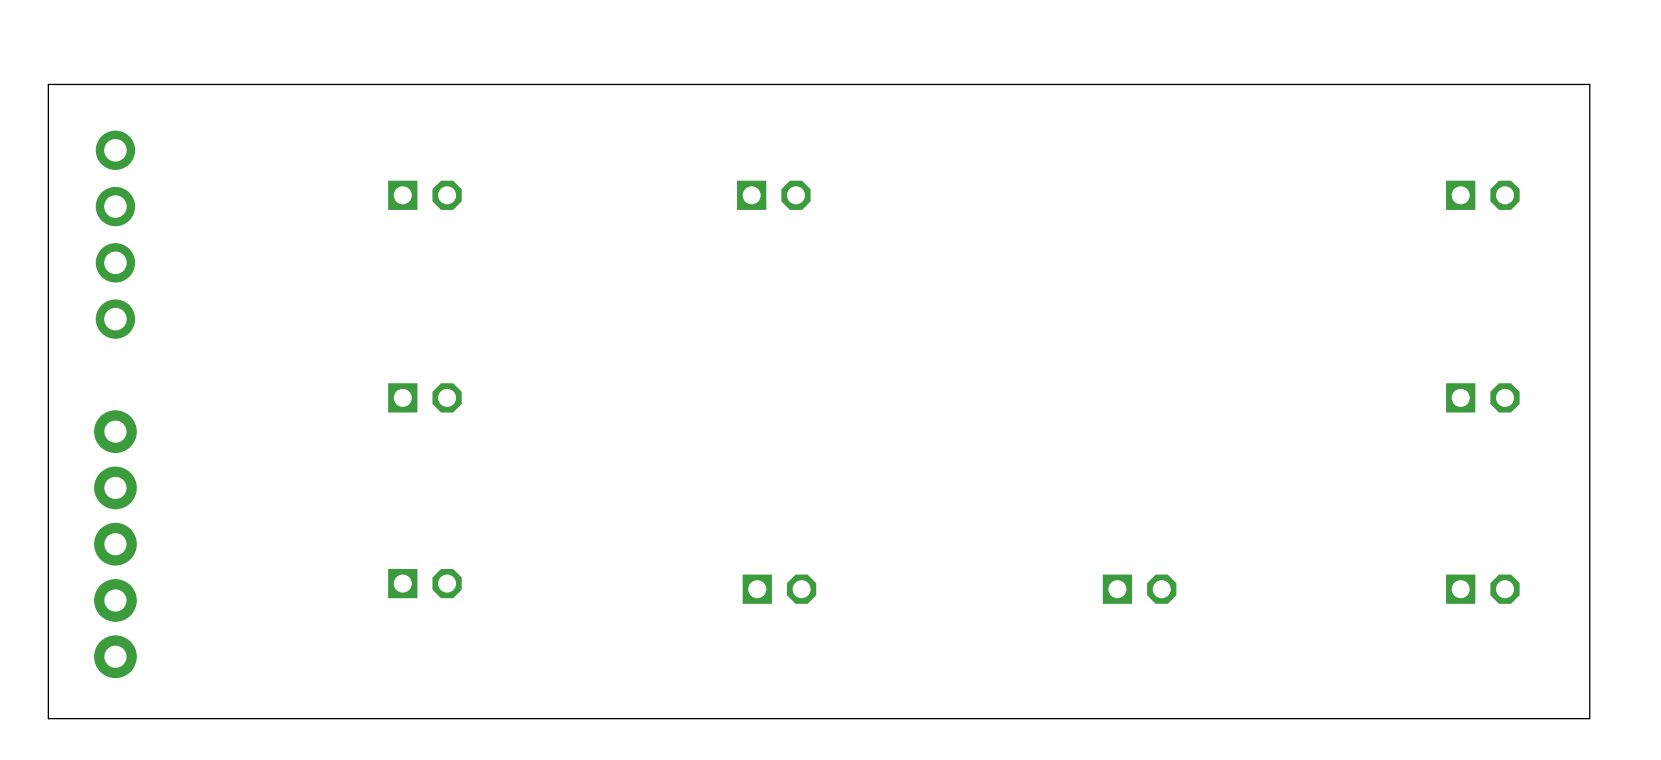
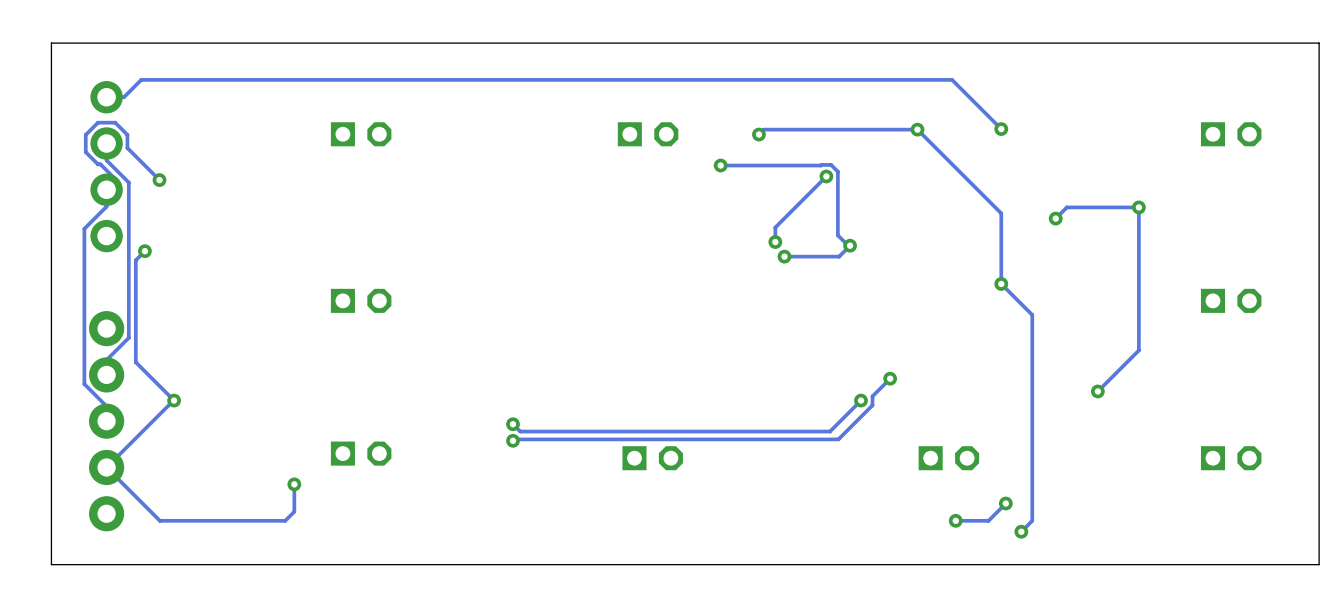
track: none -> (106, 97) (123, 97) (141, 79) (952, 79) (1001, 129)
via: none -> (917, 129)
via: none -> (1001, 129)
track: none -> (758, 134) (763, 129) (917, 129) (1001, 213) (1001, 283) (1032, 314) (1032, 520) (1021, 531)
via: none -> (758, 134)
track: none -> (106, 143) (106, 160) (128, 182) (128, 337) (106, 360) (106, 374)
track: none -> (720, 165) (831, 164) (837, 171) (837, 235) (849, 246)
via: none -> (720, 165)
track: none -> (826, 176) (775, 227) (775, 242)
via: none -> (826, 176)
track: none -> (159, 180) (127, 148) (127, 134) (115, 122) (97, 122) (85, 134) (85, 152) (116, 180) (106, 189) (106, 206) (84, 228) (84, 384) (106, 406) (106, 421)
via: none -> (159, 180)
via: none -> (1138, 207)
track: none -> (1055, 218) (1066, 207) (1138, 207) (1138, 350) (1097, 391)
via: none -> (1055, 218)
via: none -> (775, 242)
track: none -> (850, 245) (839, 256) (784, 256)
via: none -> (850, 245)
track: none -> (144, 251) (135, 260) (135, 362) (174, 400) (106, 467) (159, 520) (285, 520) (294, 511) (294, 484)
via: none -> (144, 251)
via: none -> (784, 256)
via: none -> (1001, 283)
track: none -> (890, 378) (872, 396) (872, 405) (838, 439) (512, 440)
via: none -> (890, 378)
via: none -> (1097, 391)
via: none -> (174, 400)
track: none -> (860, 400) (830, 431) (520, 431) (512, 424)
via: none -> (860, 400)
via: none -> (512, 424)
via: none -> (512, 440)
via: none -> (294, 484)
track: none -> (1005, 503) (988, 520) (955, 520)
via: none -> (1005, 503)
via: none -> (955, 520)
via: none -> (1021, 531)

